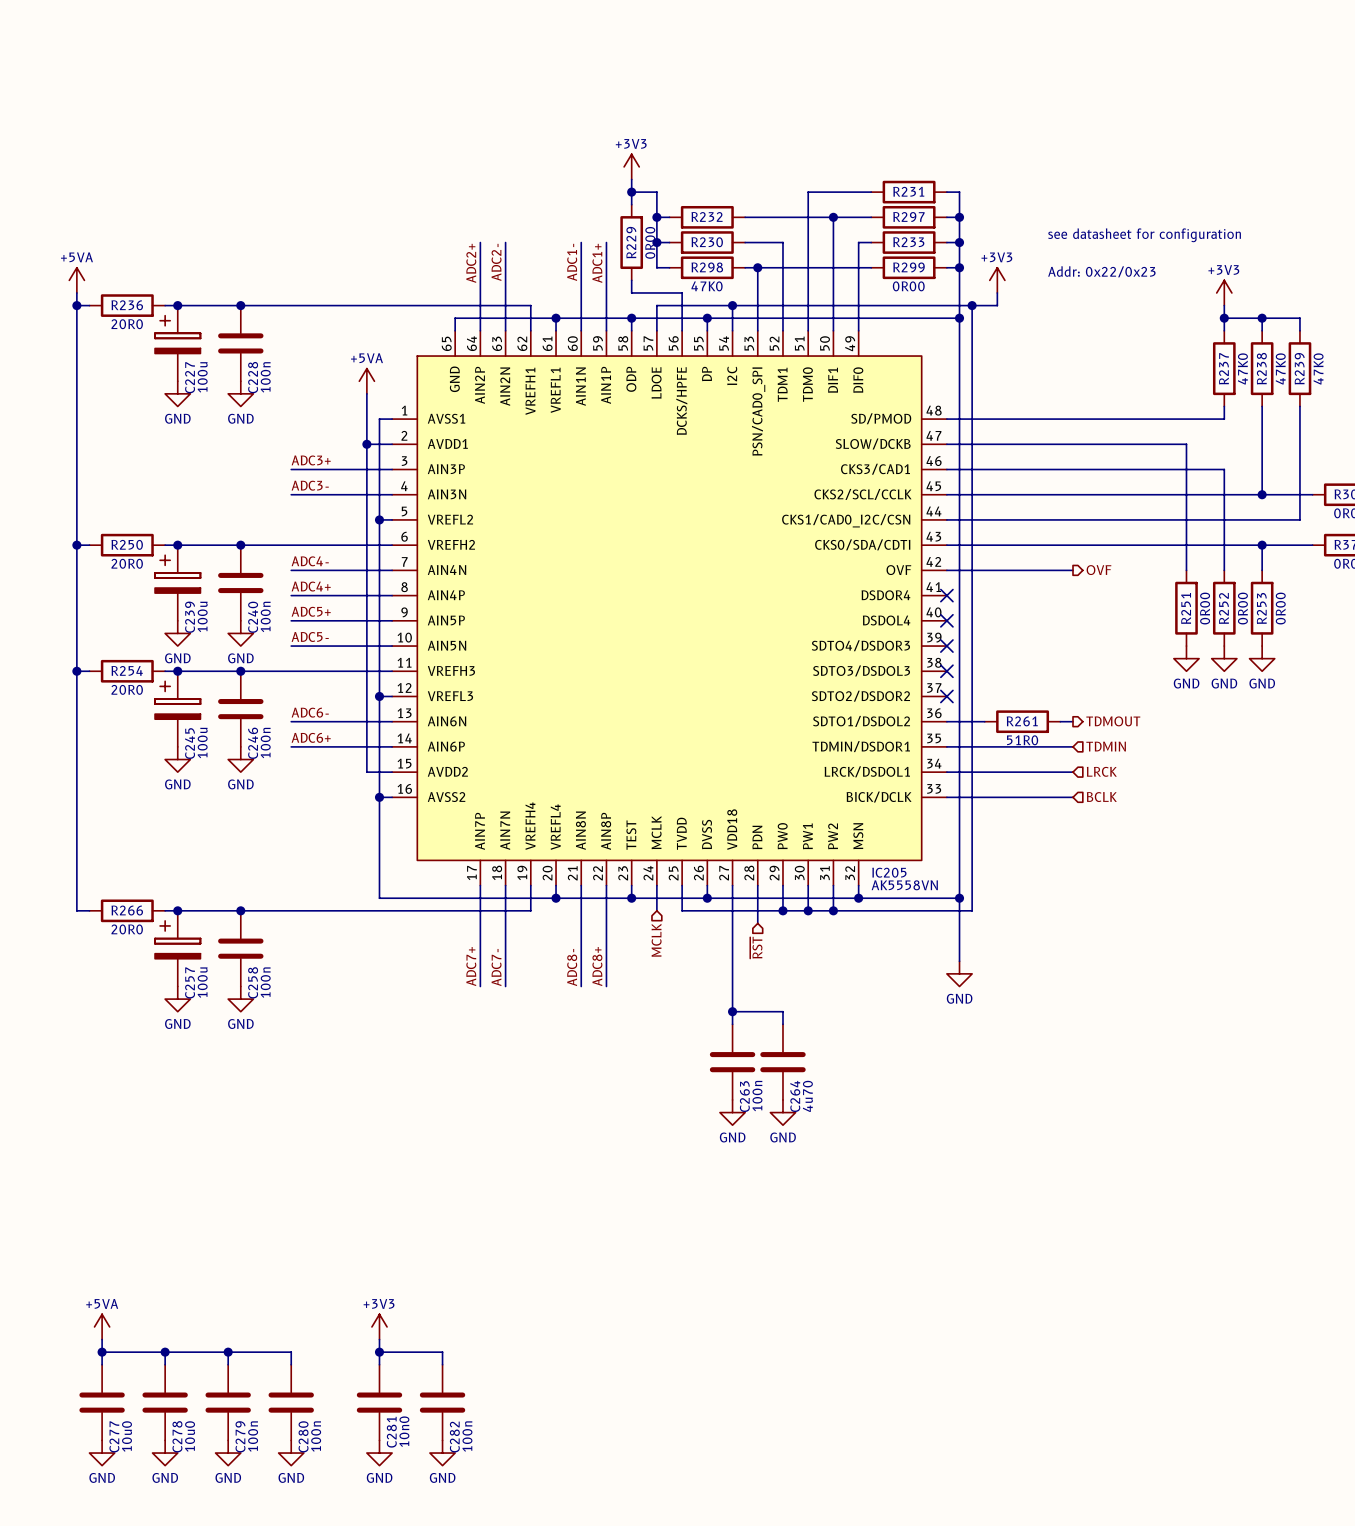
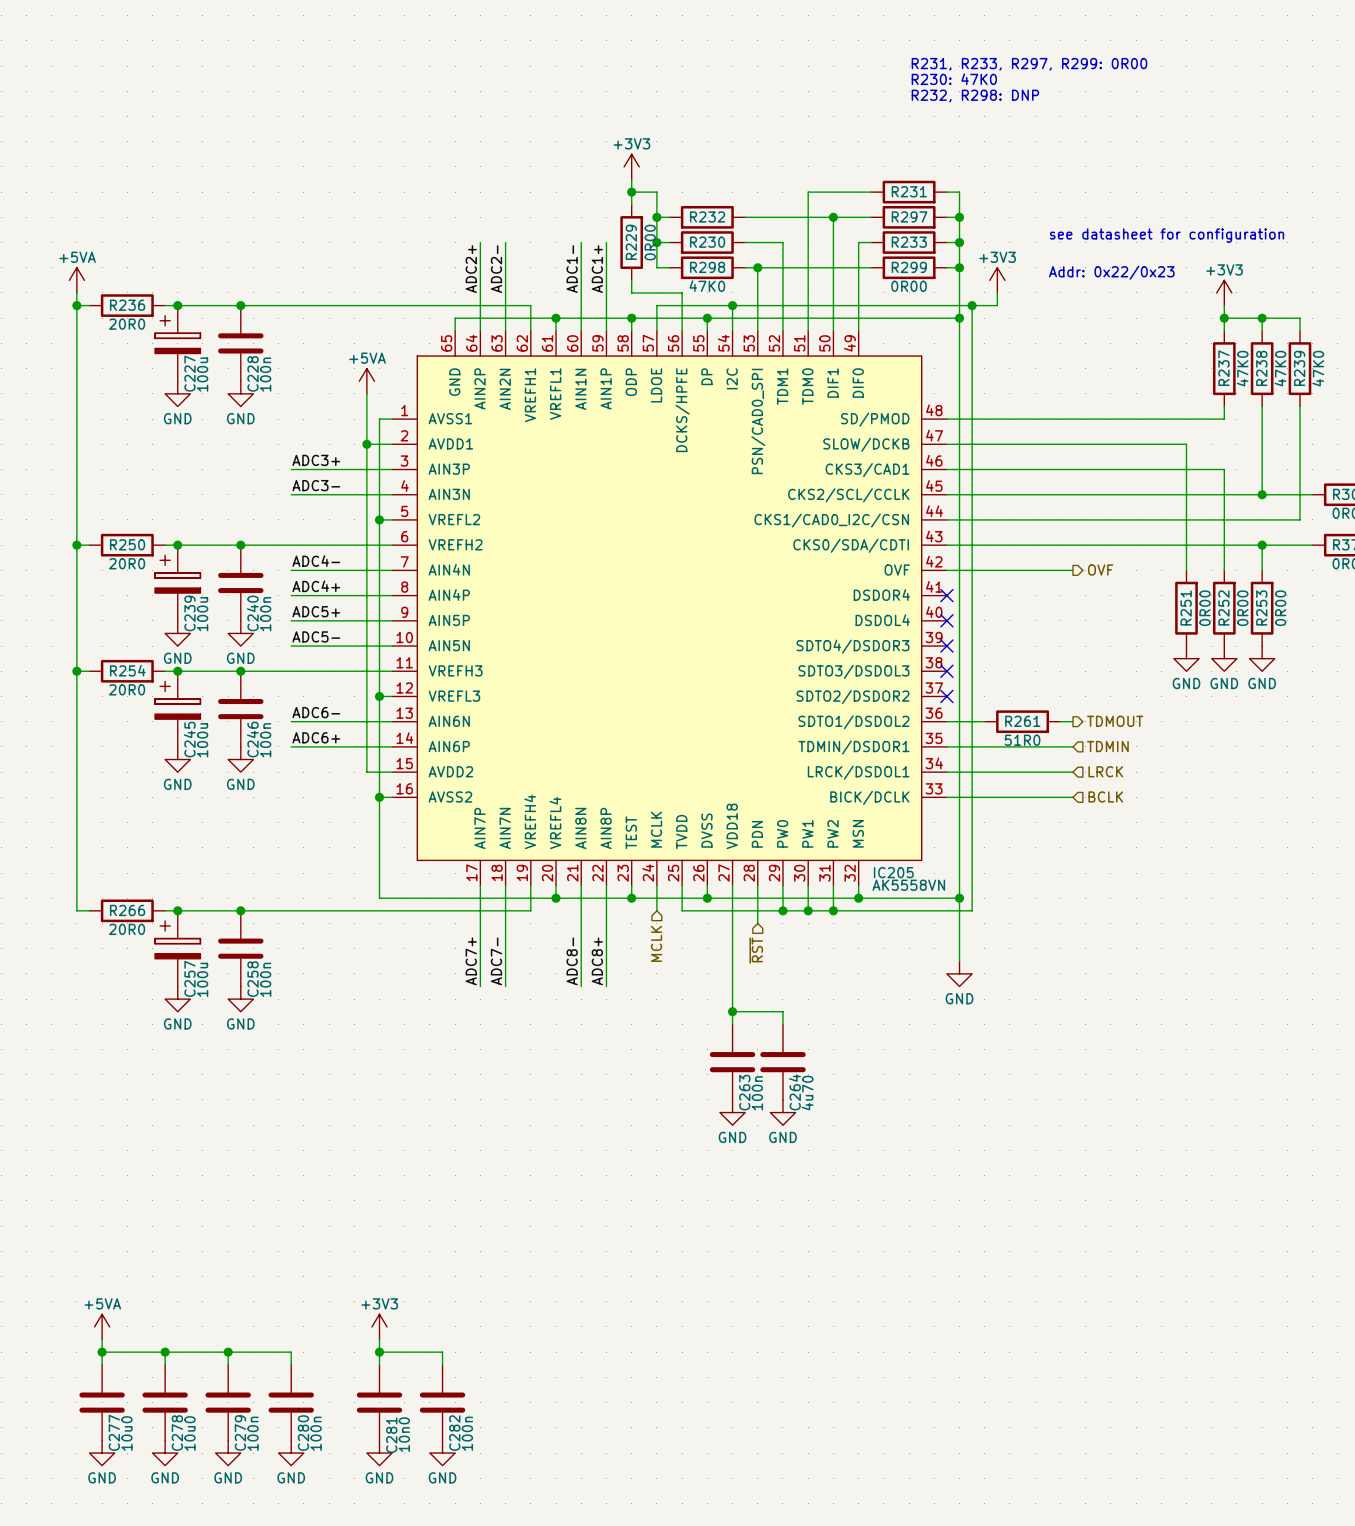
text: none -> R231, R233, R297, R299: 0R00 (1029, 64)
text: none -> R230: 47K0 (954, 79)
text: none -> R232, R298: DNP (975, 95)

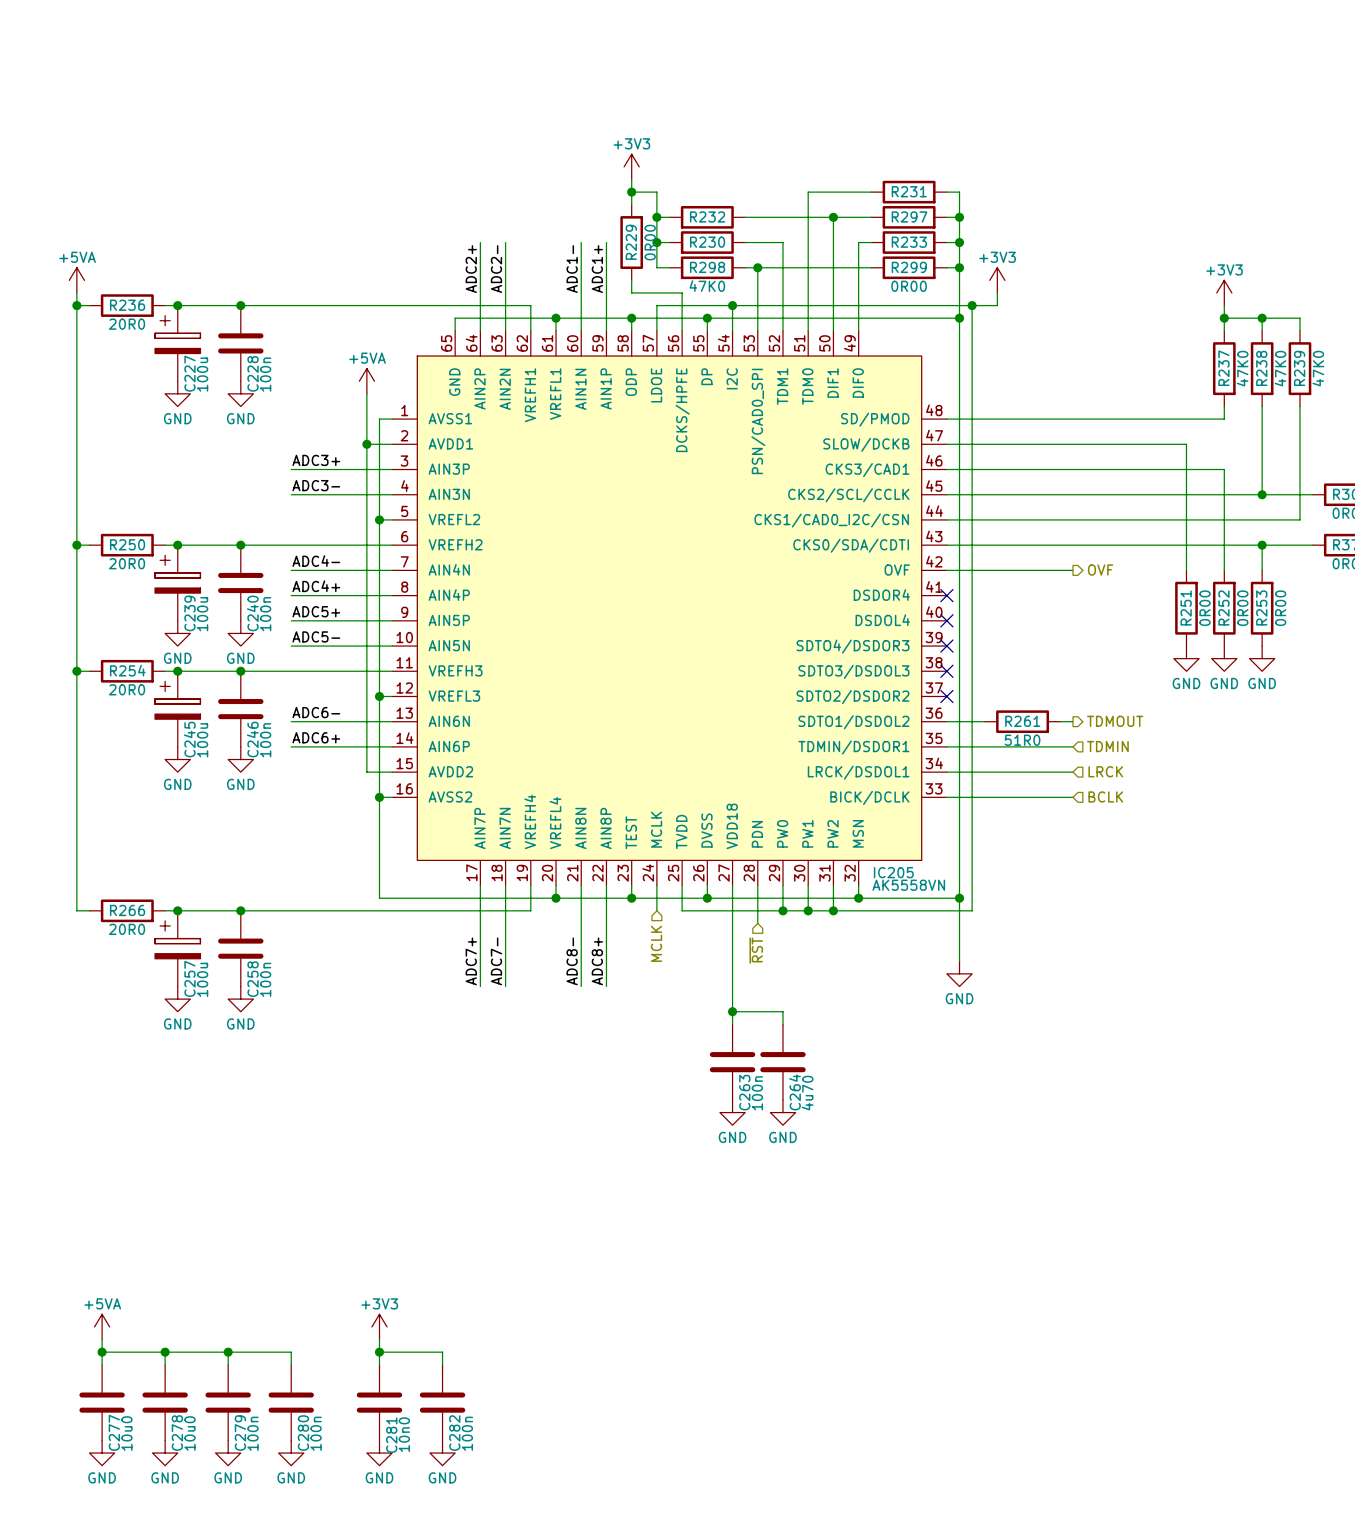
text: R231, R233, R297, R299: 0R00 (1029, 64) -> none
text: R230: 47K0 (954, 79) -> none
text: R232, R298: DNP (975, 95) -> none
text: see datasheet for configuration (1167, 235) -> none
text: Addr: 0x22/0x23 (1111, 272) -> none

